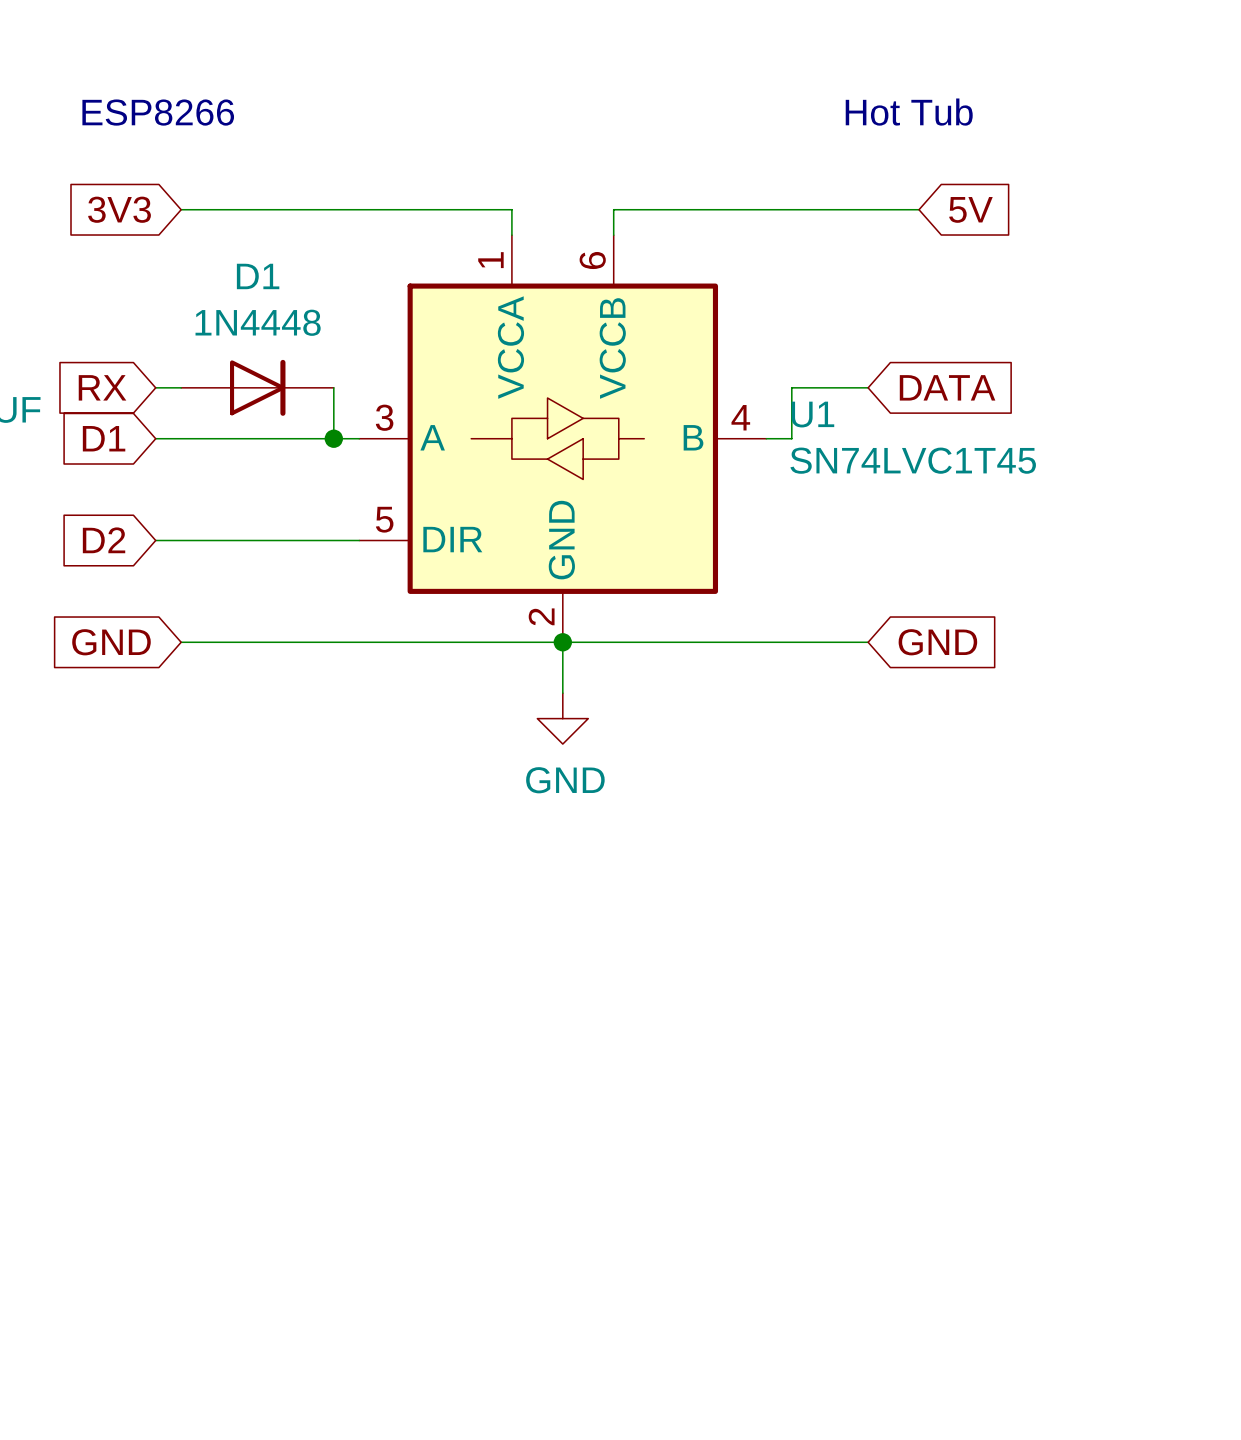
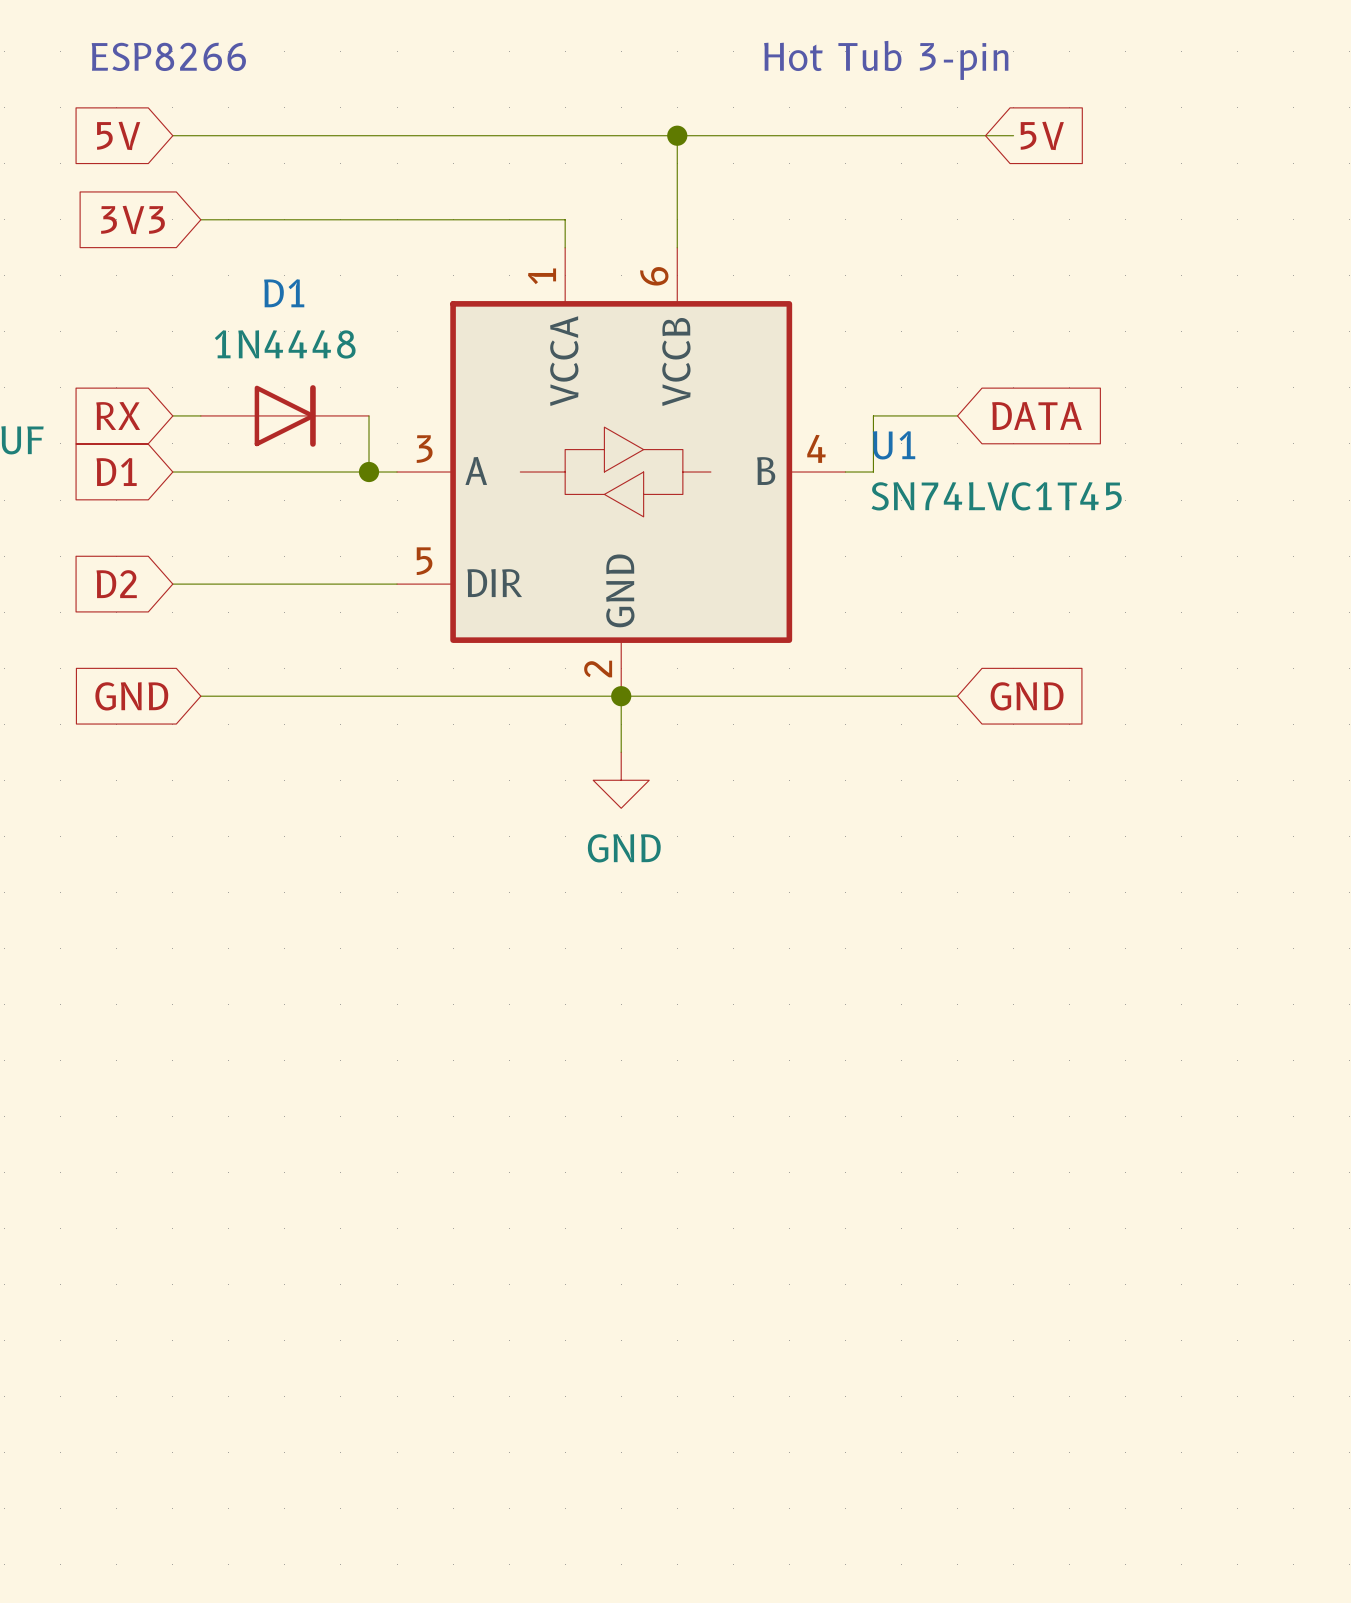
text position: ESP8266 (158, 112) -> ESP8266 (168, 56)
text: Hot Tub (909, 112) -> Hot Tub 3-pin (886, 60)
global label: none -> 5V (118, 135)
wire: none -> (172, 135) (1013, 135)
junction: none -> (677, 135)
wire: (613, 209) (919, 209) -> (677, 219) (677, 135)
global label position: 5V (970, 209) -> 5V (1042, 135)

